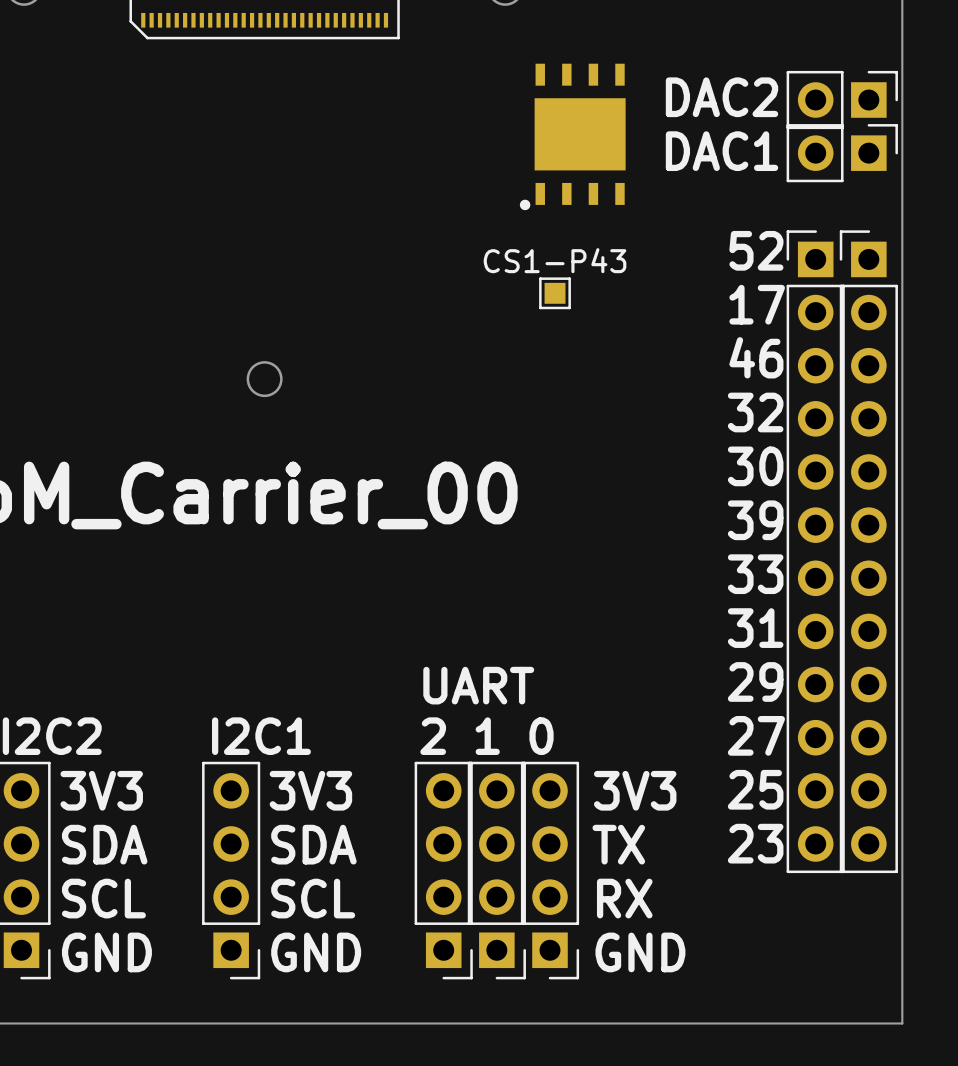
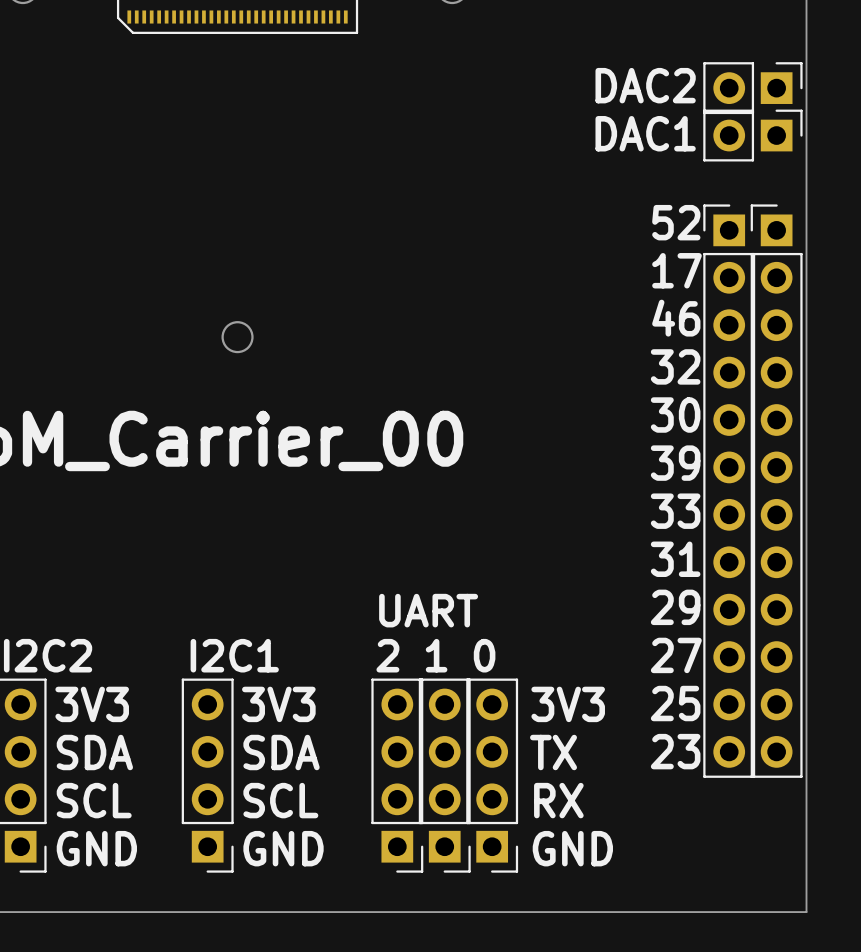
part: (572, 136) -> none
CS1-P43: (555, 293) -> none

